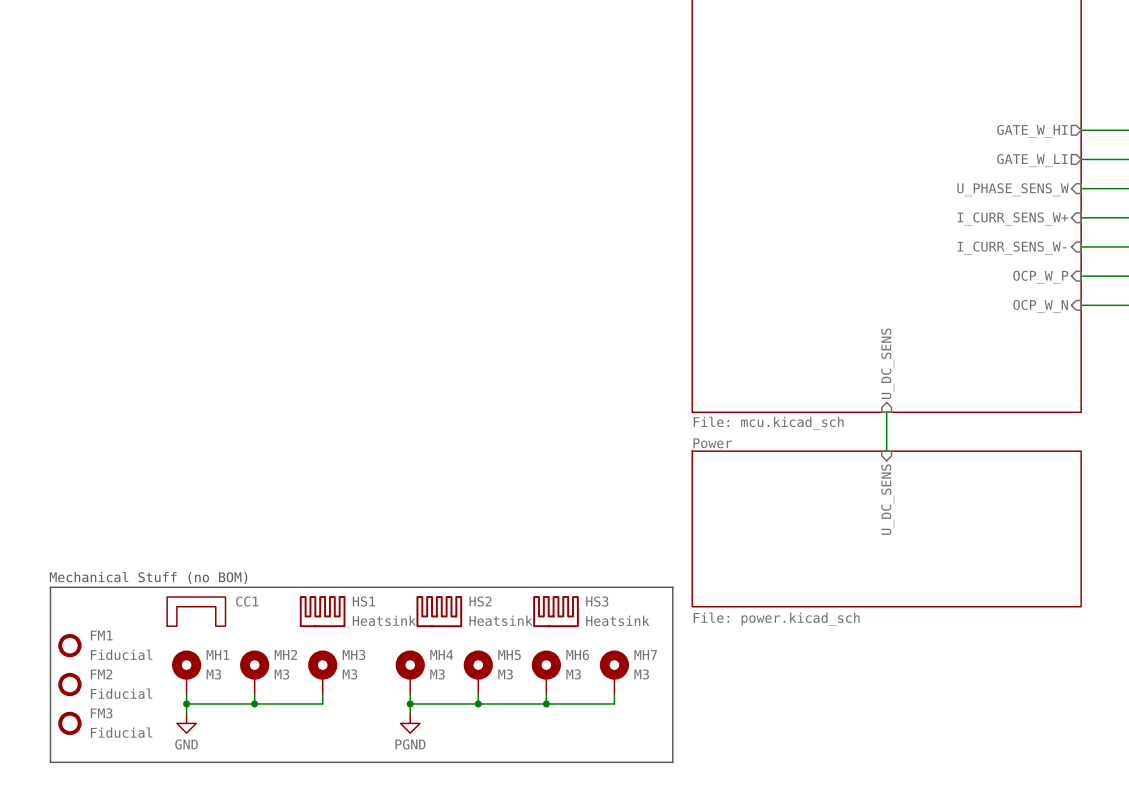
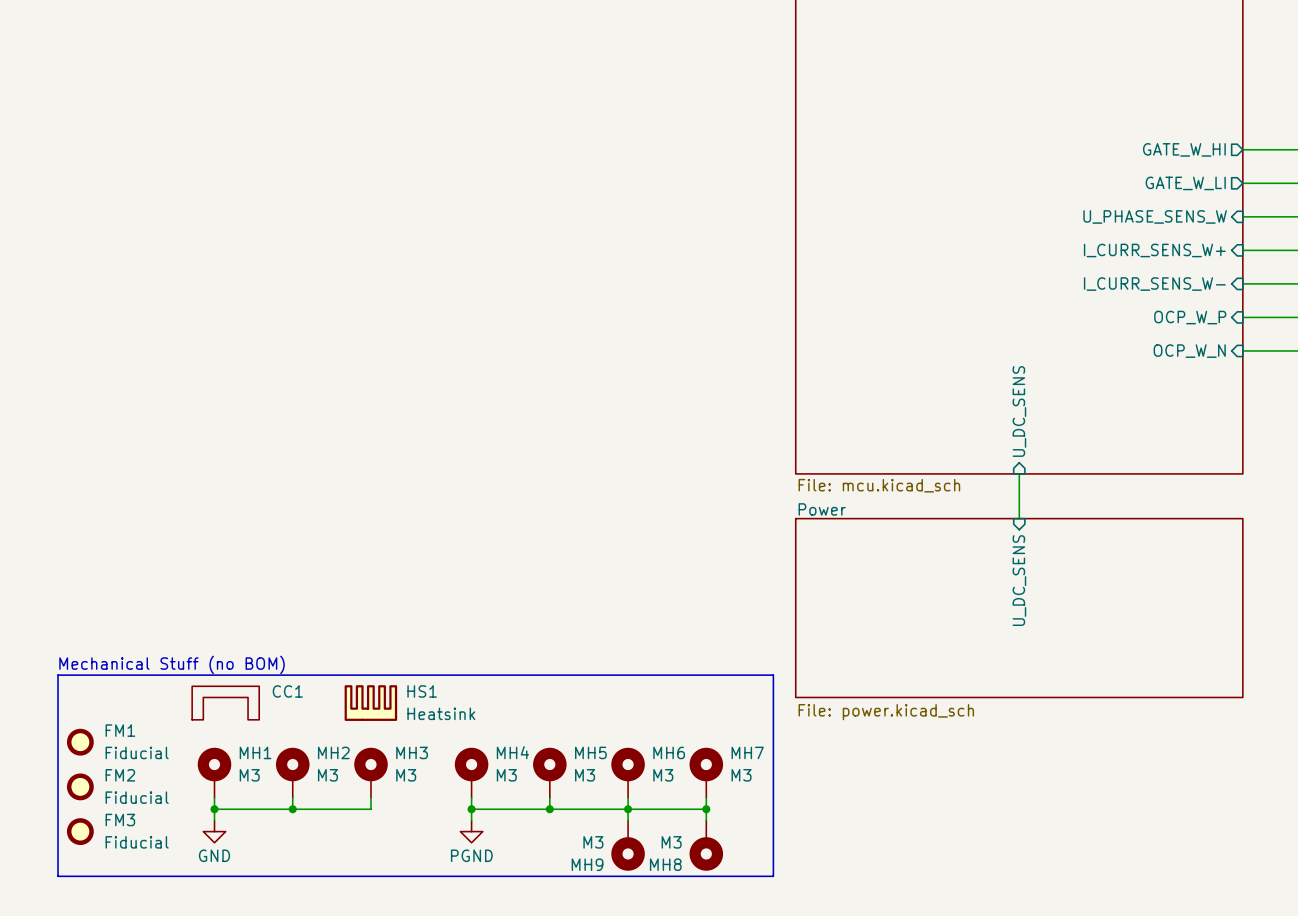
HS2: Heatsink (439, 611) -> none
HS3: Heatsink (555, 611) -> none
wire: none -> (628, 809) (628, 820)
wire: none -> (706, 809) (706, 820)
junction: none -> (706, 809)
MH9: none -> M3 (628, 845)
MH8: none -> M3 (706, 845)

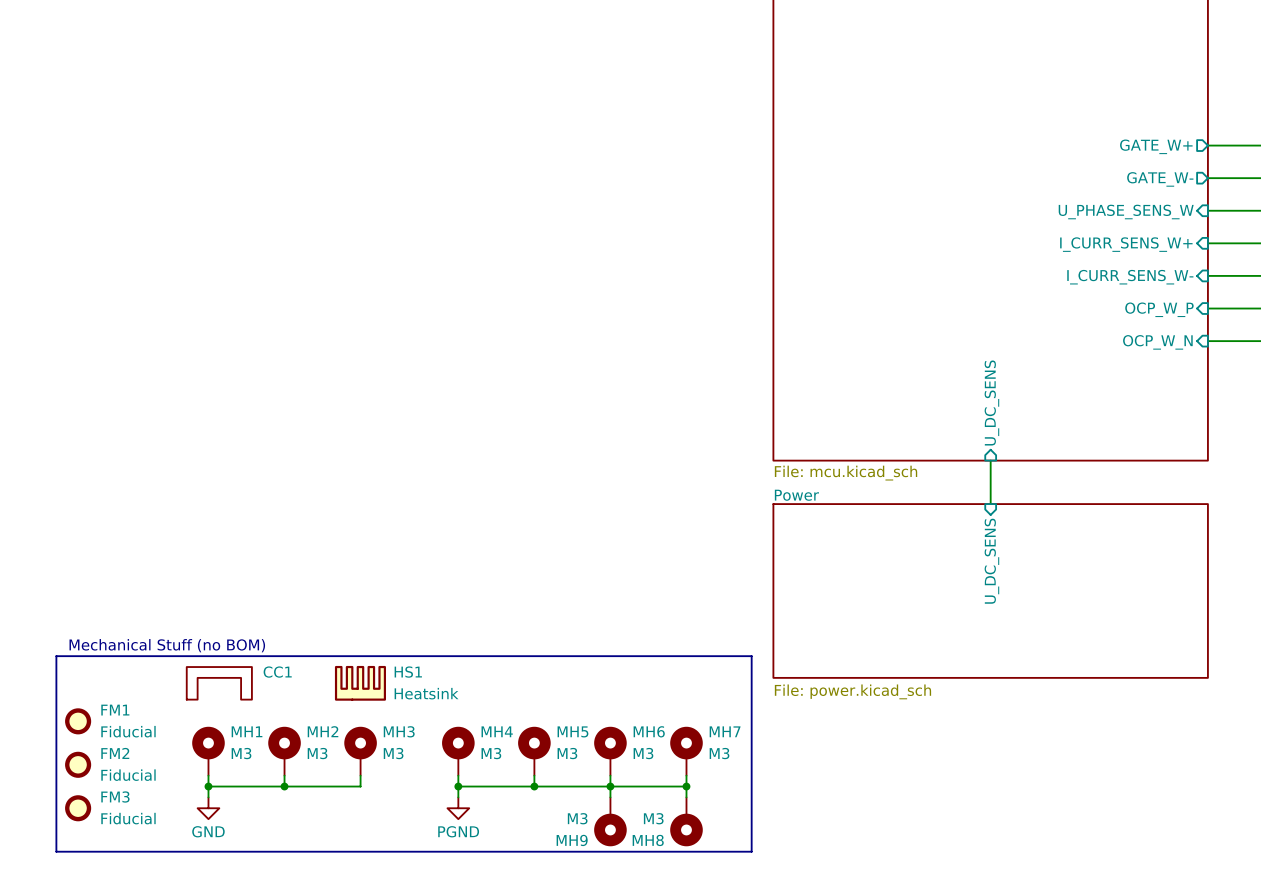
sheet pin: GATE_W_HI (1184, 149) -> GATE_W+ (1156, 146)
sheet pin: GATE_W_LI (1185, 183) -> GATE_W- (1160, 179)

